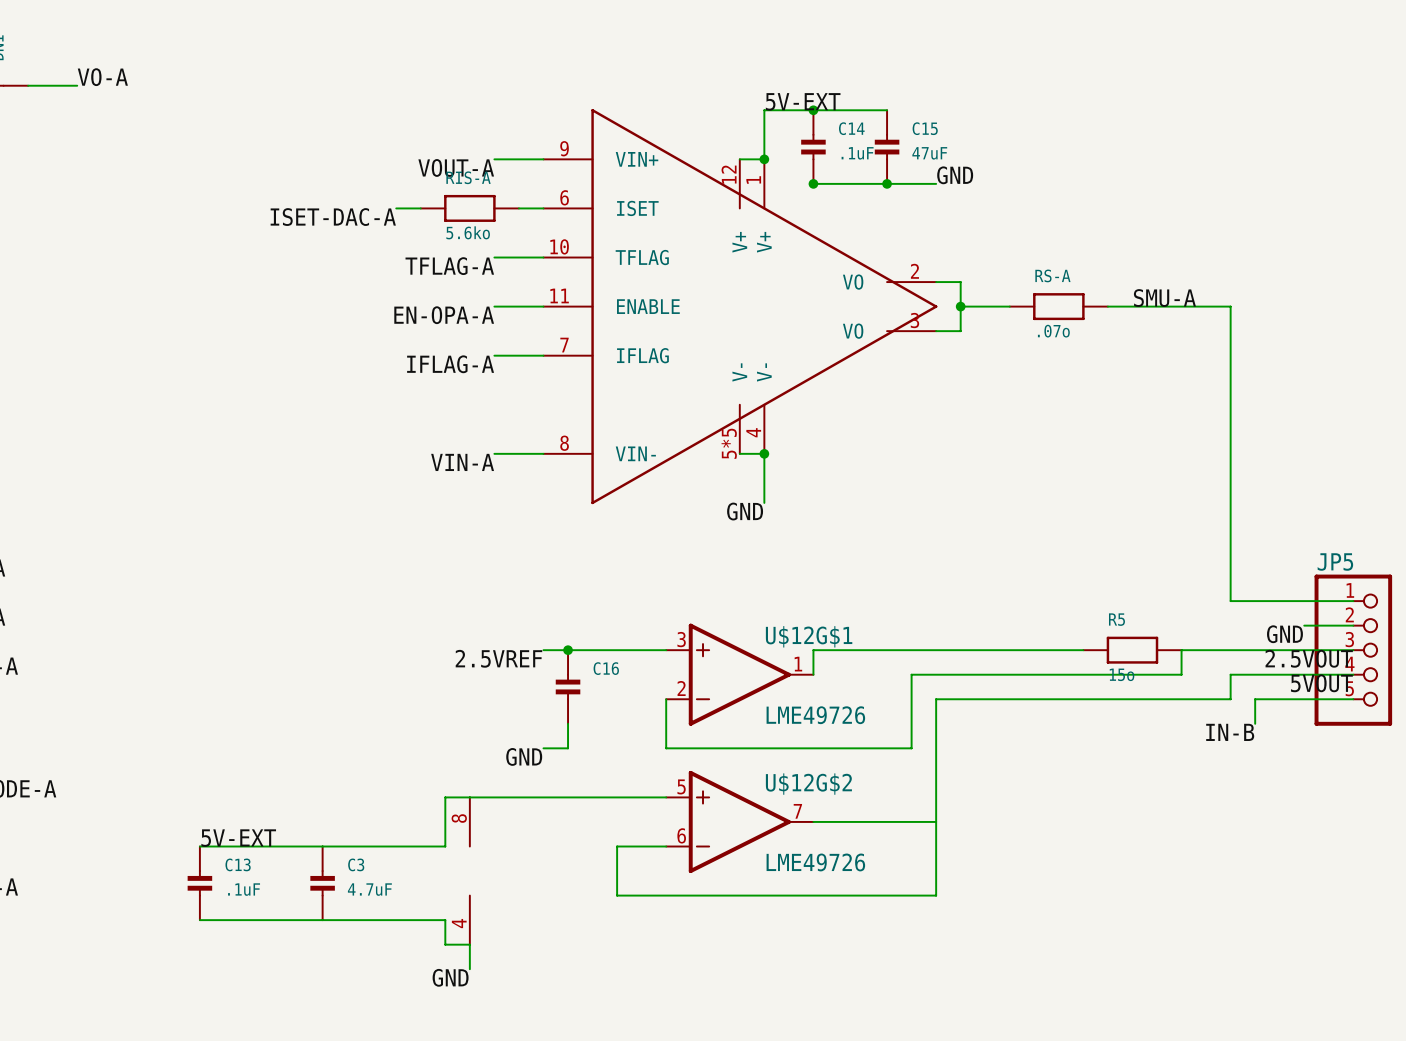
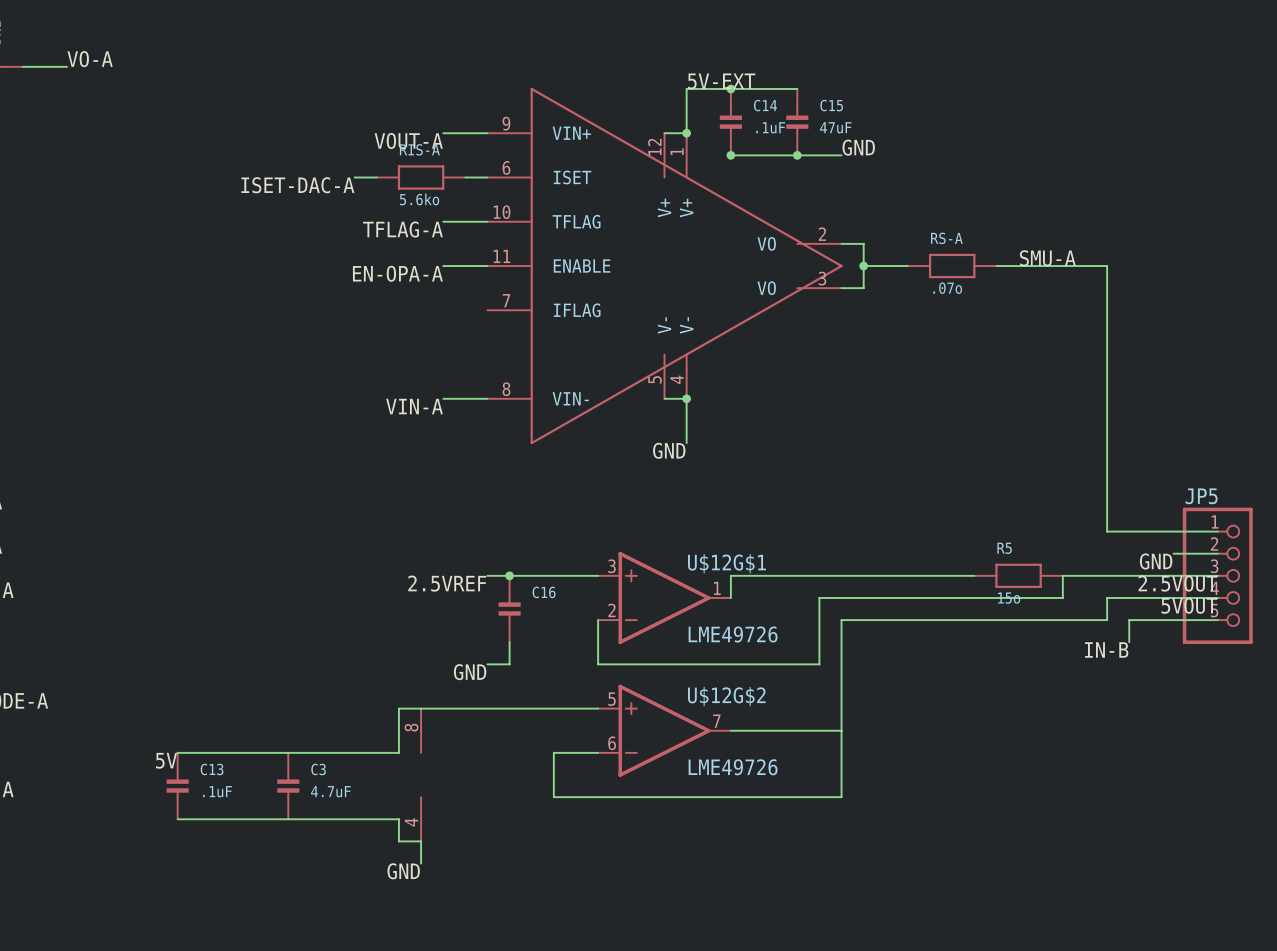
wire: (494, 355) (543, 355) -> none
label: IFLAG-A (450, 364) -> none
part pin number: 5*5 (729, 443) -> 5 (655, 379)
label: 5V-EXT (238, 838) -> 5V (166, 760)

